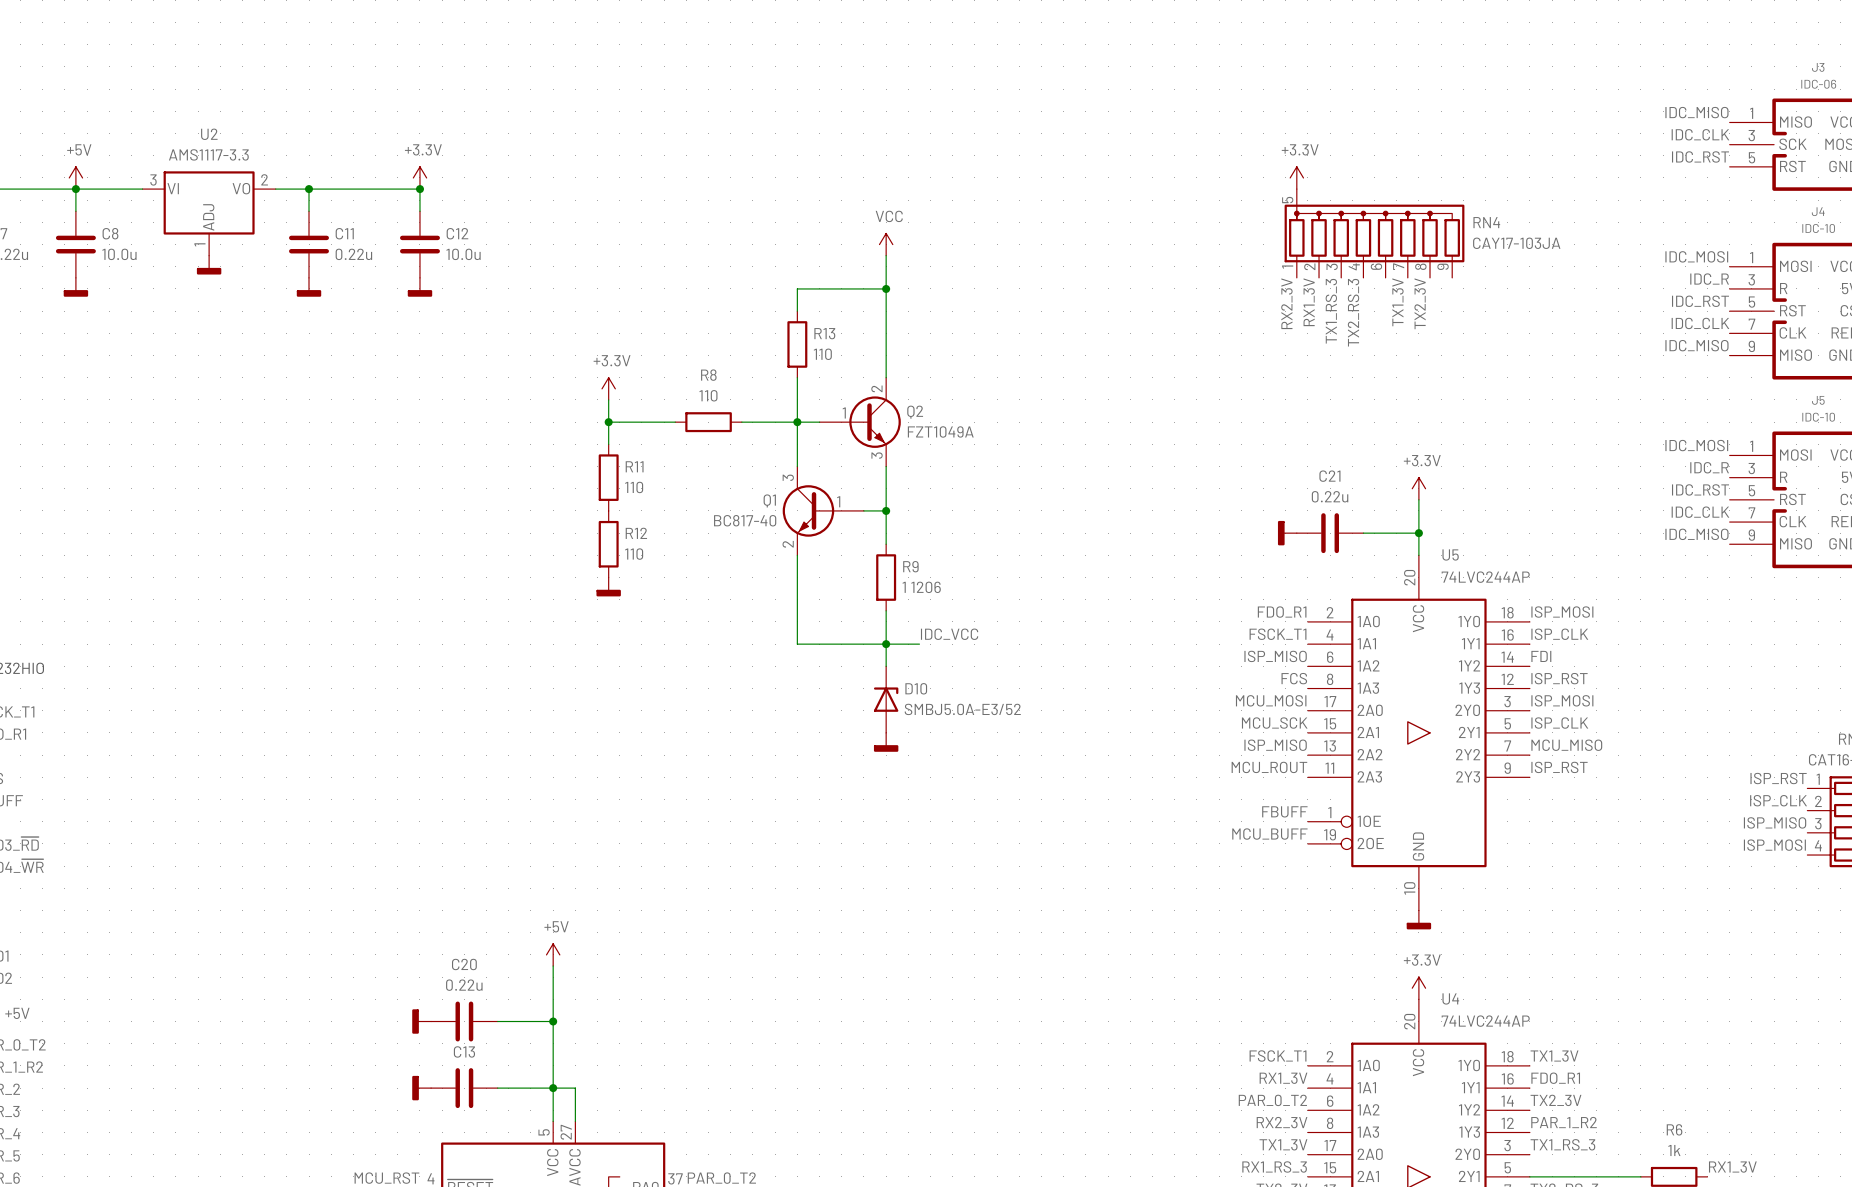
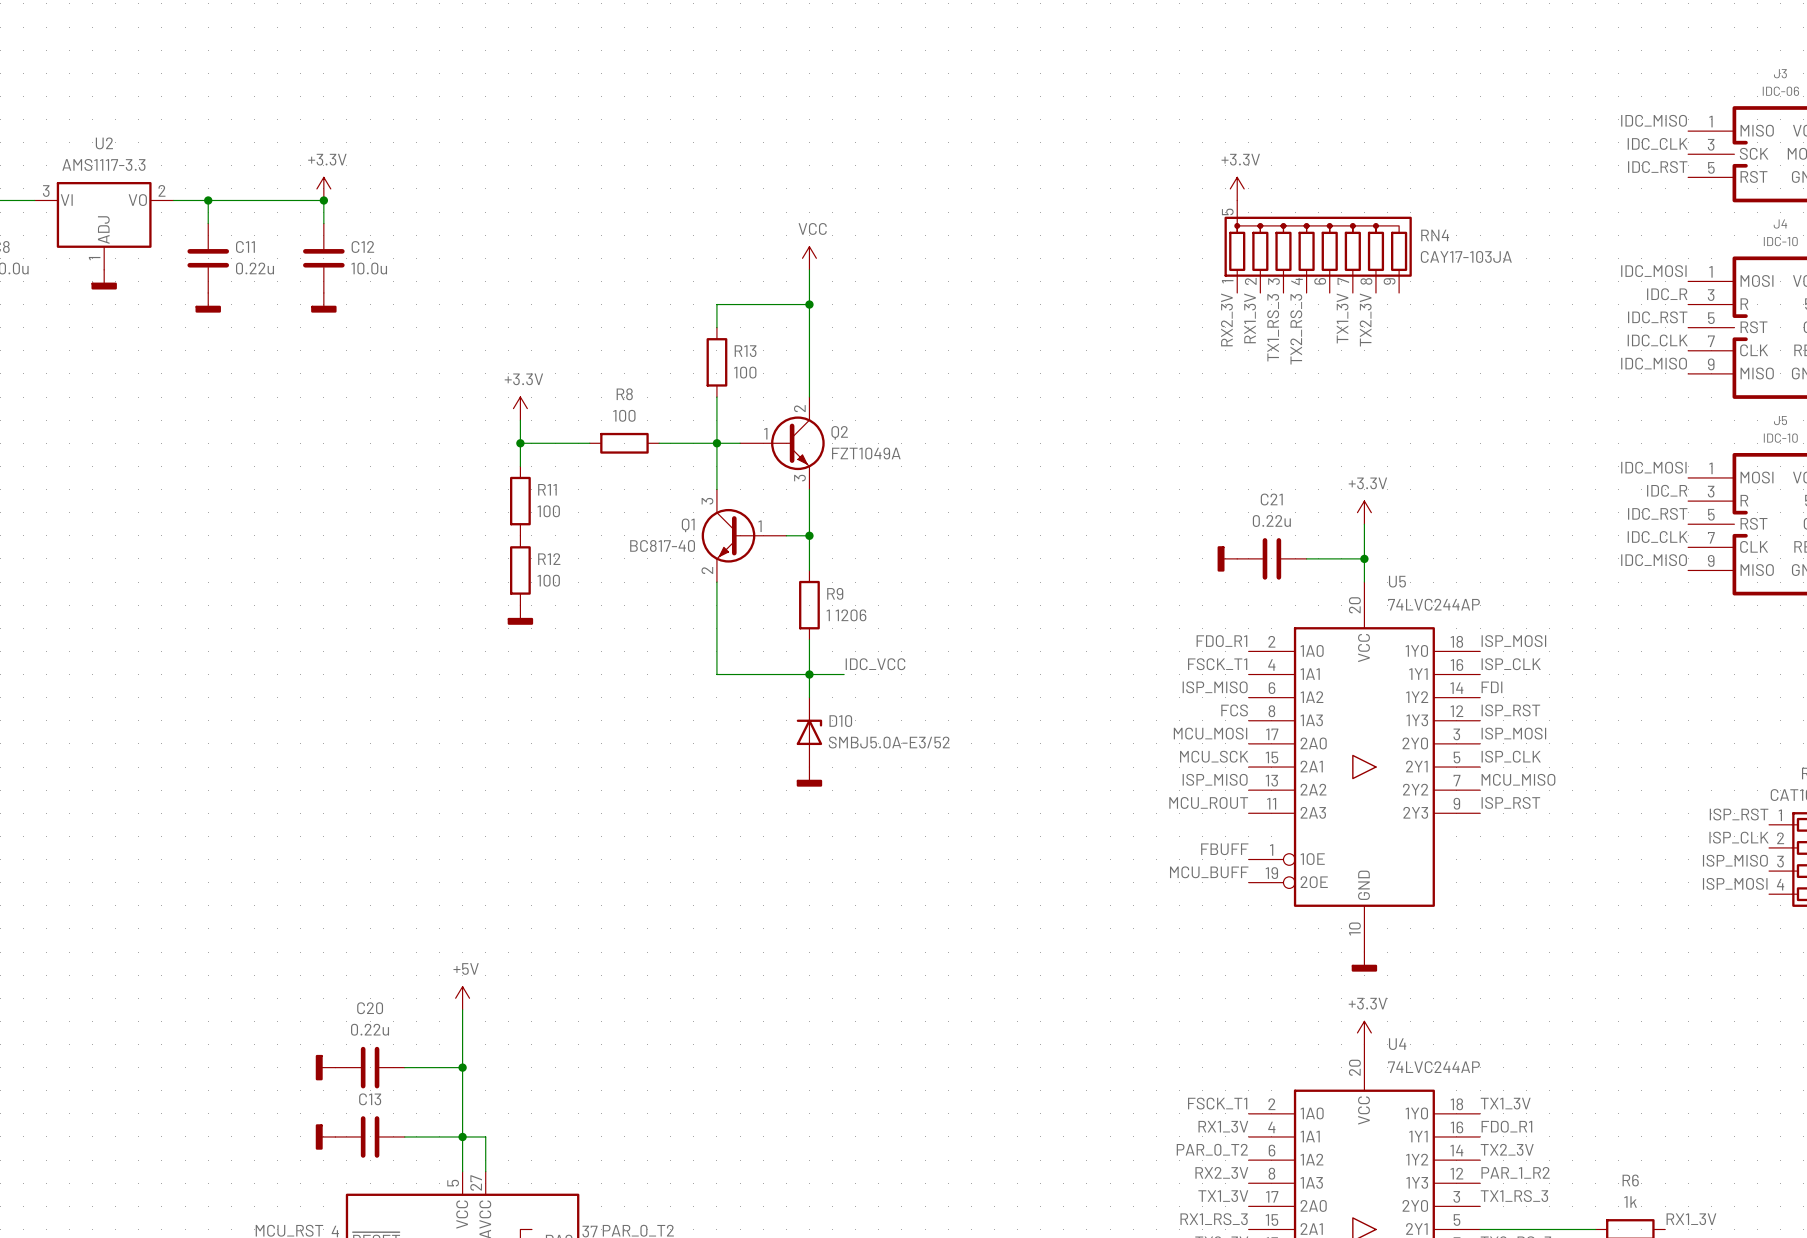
R13 value: 110 (822, 354) -> 100 (745, 372)
R8 value: 110 (708, 395) -> 100 (624, 415)
R11 value: 110 (634, 487) -> 100 (548, 511)
R12 value: 110 (634, 554) -> 100 (548, 580)

